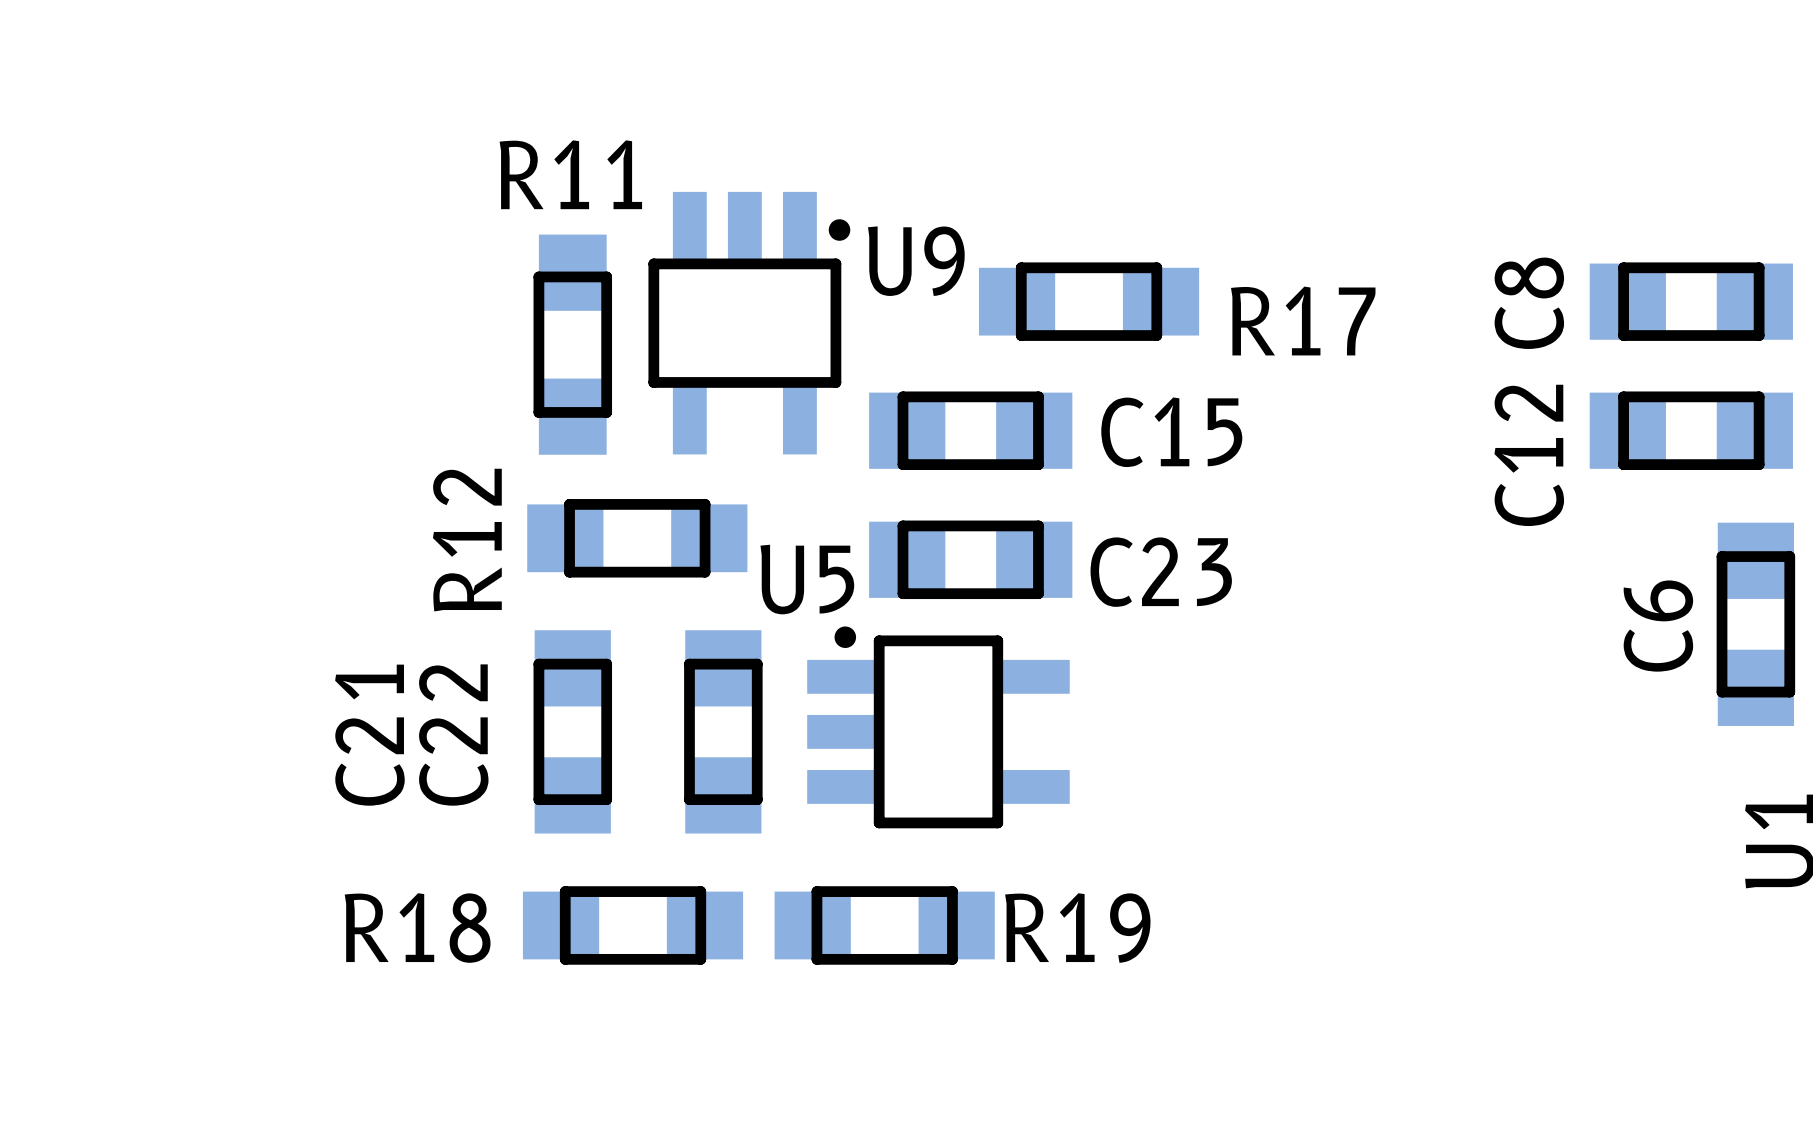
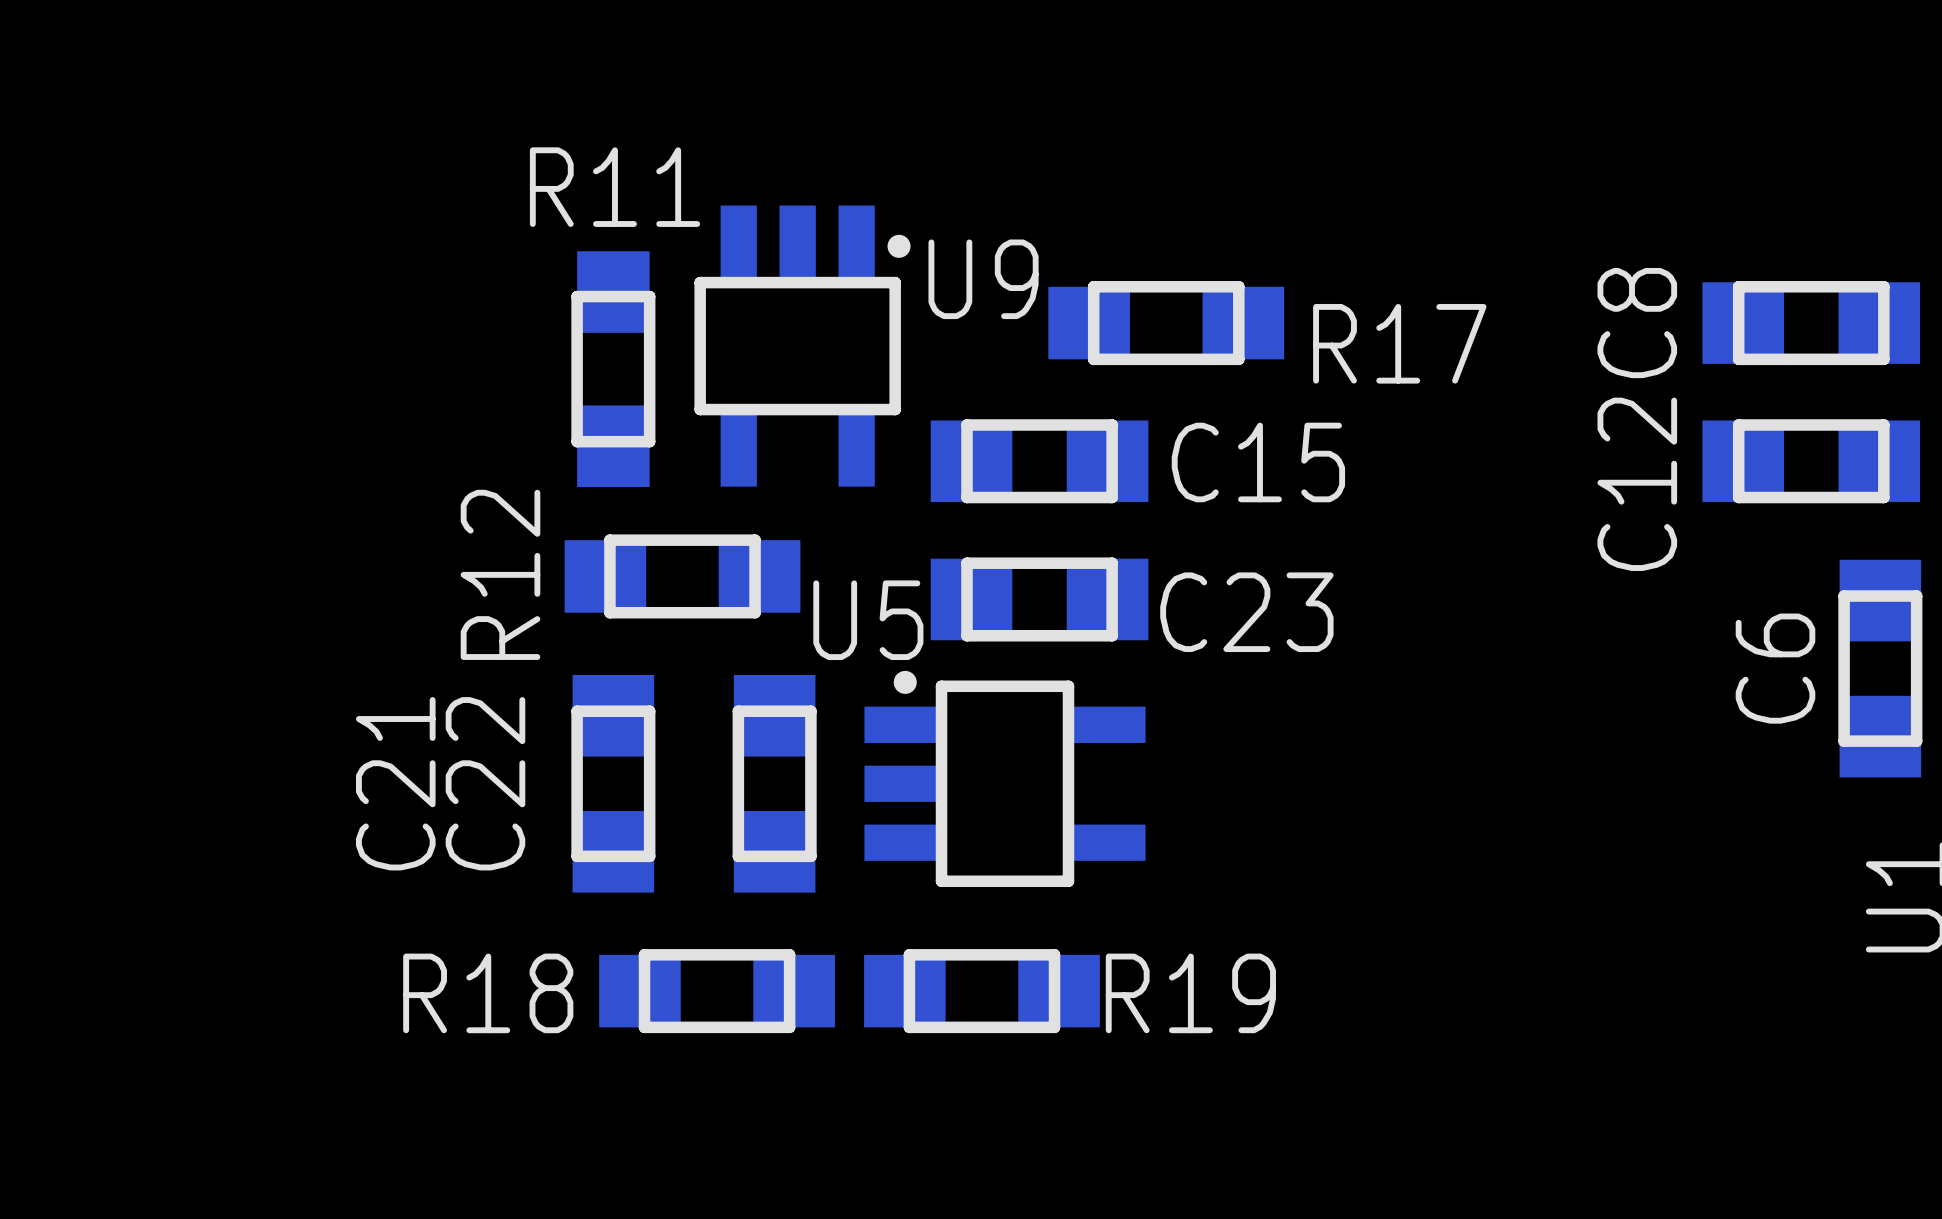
R18 position: (633, 925) -> (717, 991)
R19 position: (884, 925) -> (981, 991)

